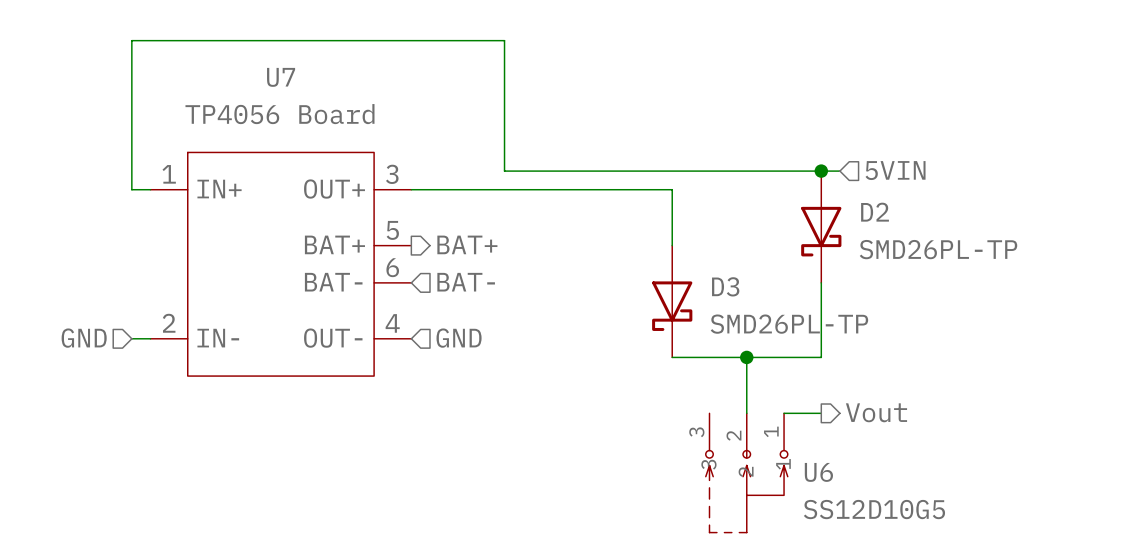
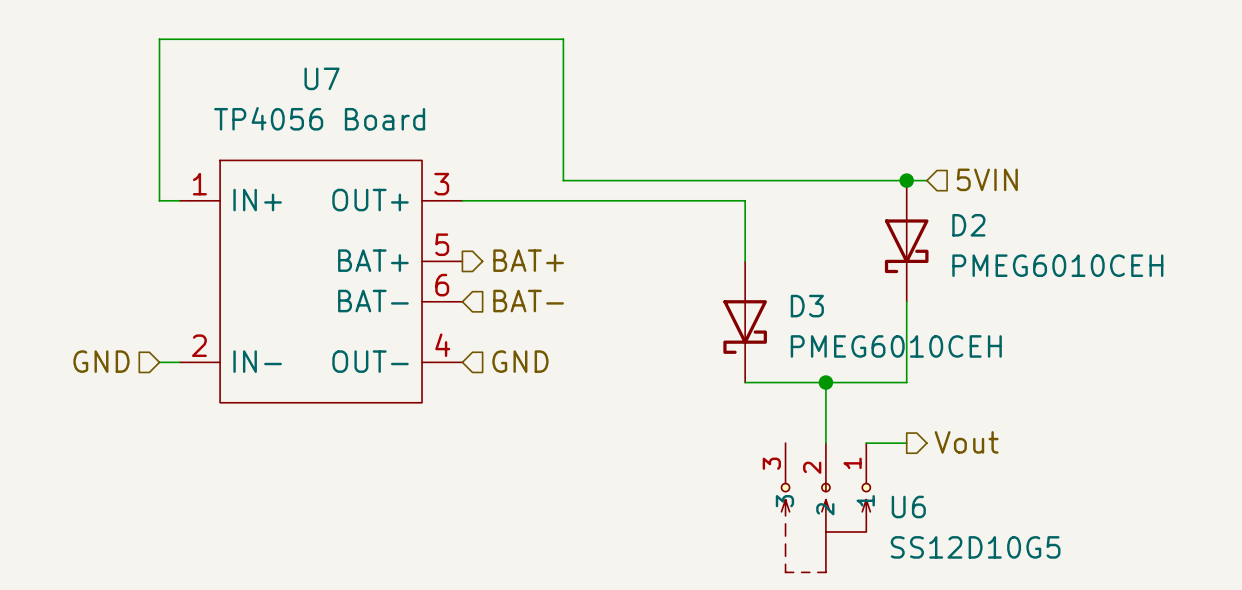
D2 value: SMD26PL-TP (938, 249) -> PMEG6010CEH (1057, 265)
D3 value: SMD26PL-TP (789, 324) -> PMEG6010CEH (896, 346)

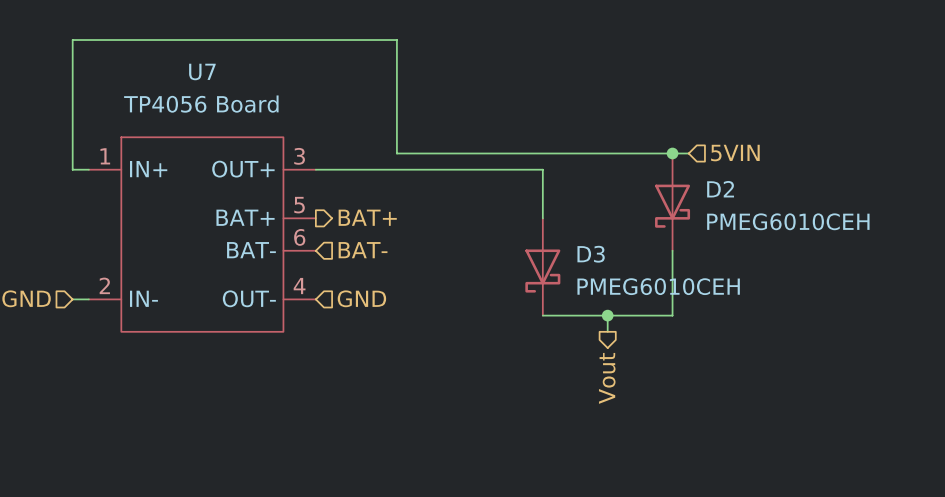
wire: (825, 402) (825, 443) -> none
hierarchical label rotation: 0° (966, 442) -> 90° clockwise (607, 378)
hierarchical label position: Vout (966, 442) -> Vout (607, 378)
wire: (866, 443) (906, 443) -> none
U6: SS12D10G5 (825, 507) -> none

